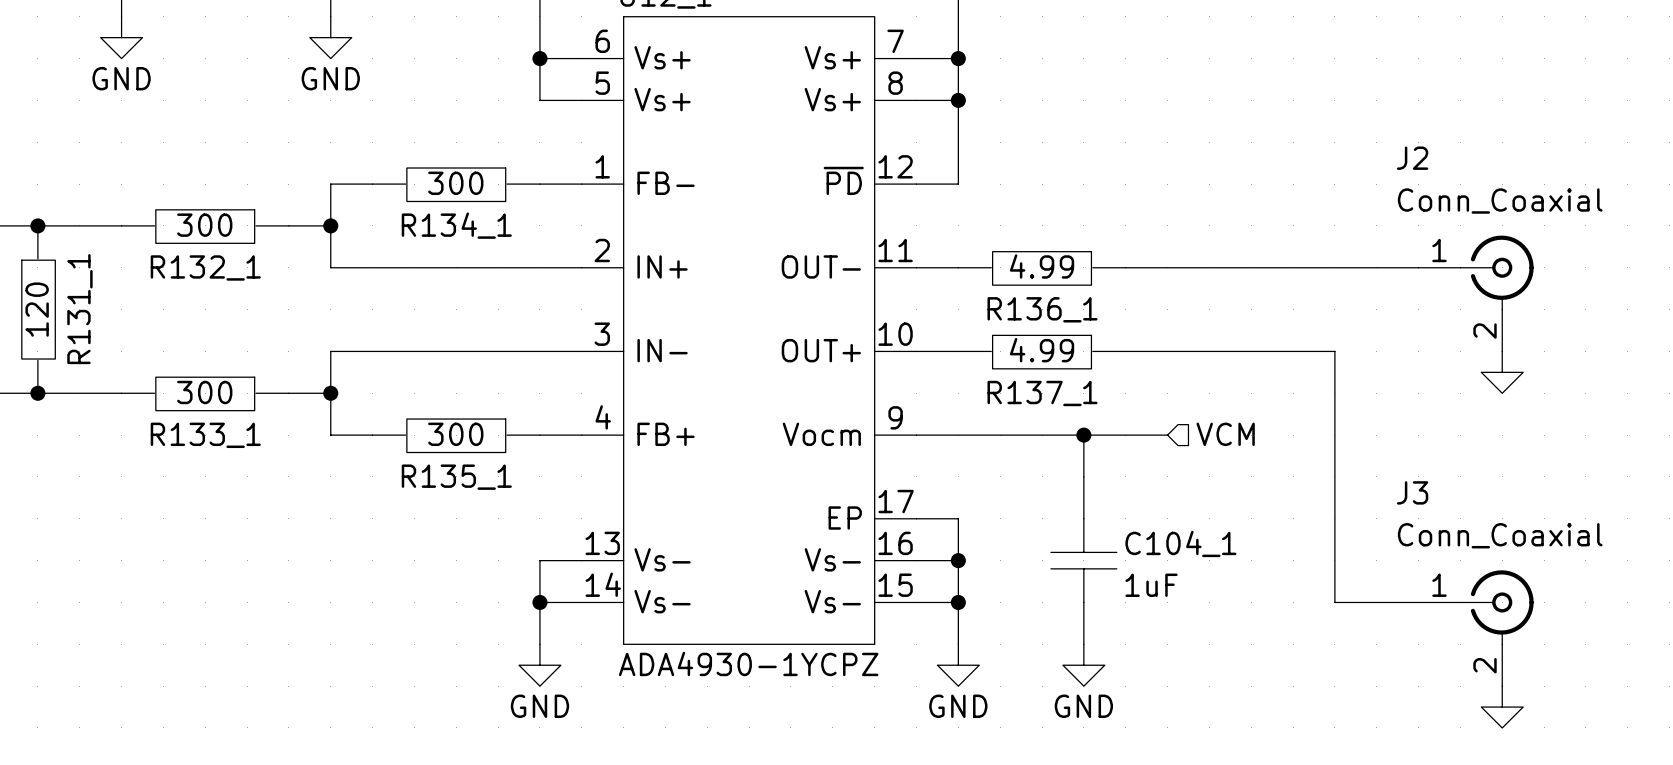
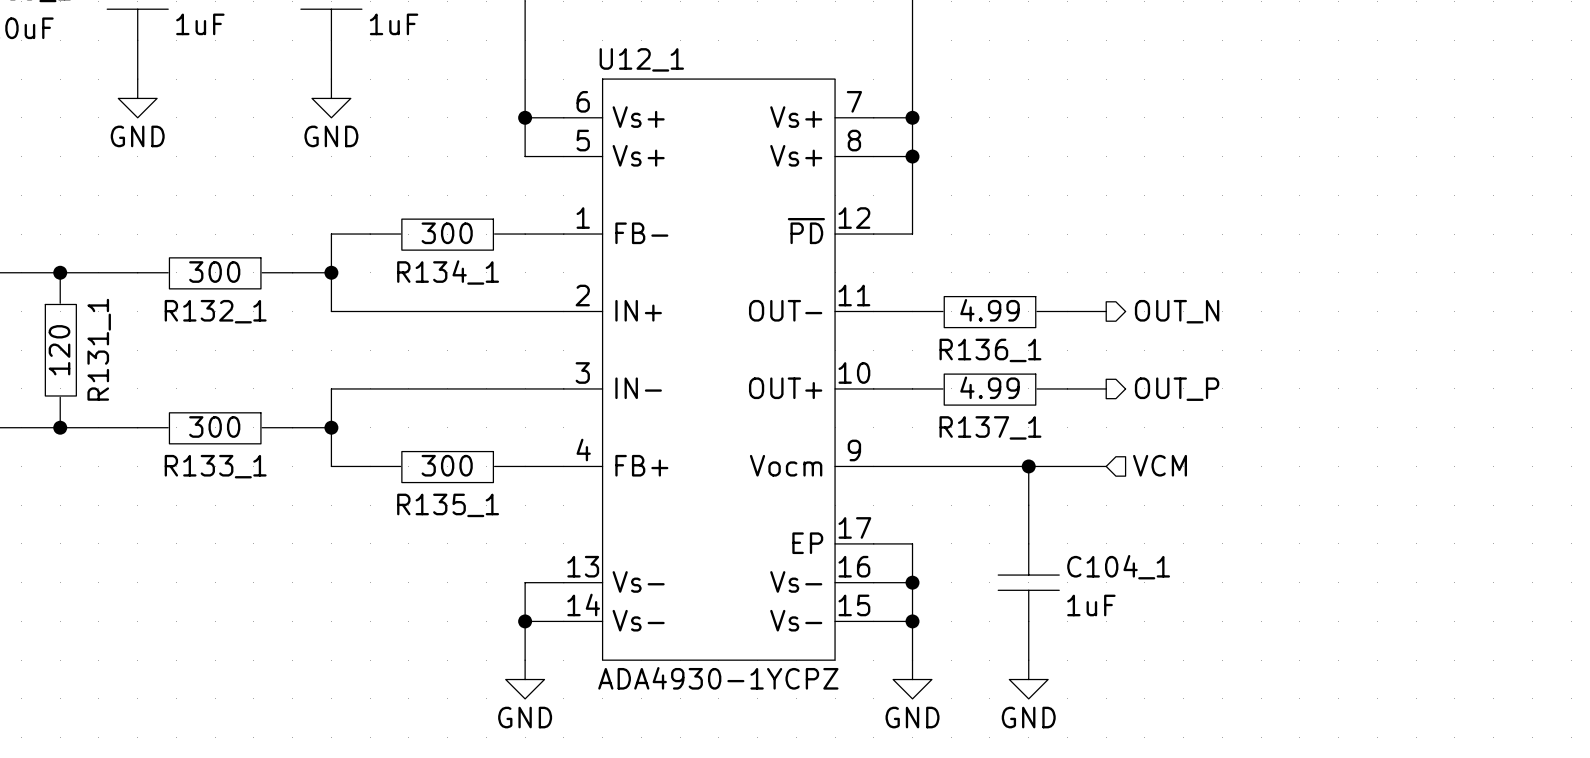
wire: (1167, 267) (1418, 267) -> none
hierarchical label: none -> OUT_N (1177, 311)
J2: Conn_Coaxial (1476, 293) -> none
wire: (1167, 351) (1334, 351) (1334, 602) (1418, 602) -> none
hierarchical label: none -> OUT_P (1177, 389)
power symbol: (1502, 372) -> none
J3: Conn_Coaxial (1476, 628) -> none
power symbol: (1502, 707) -> none

